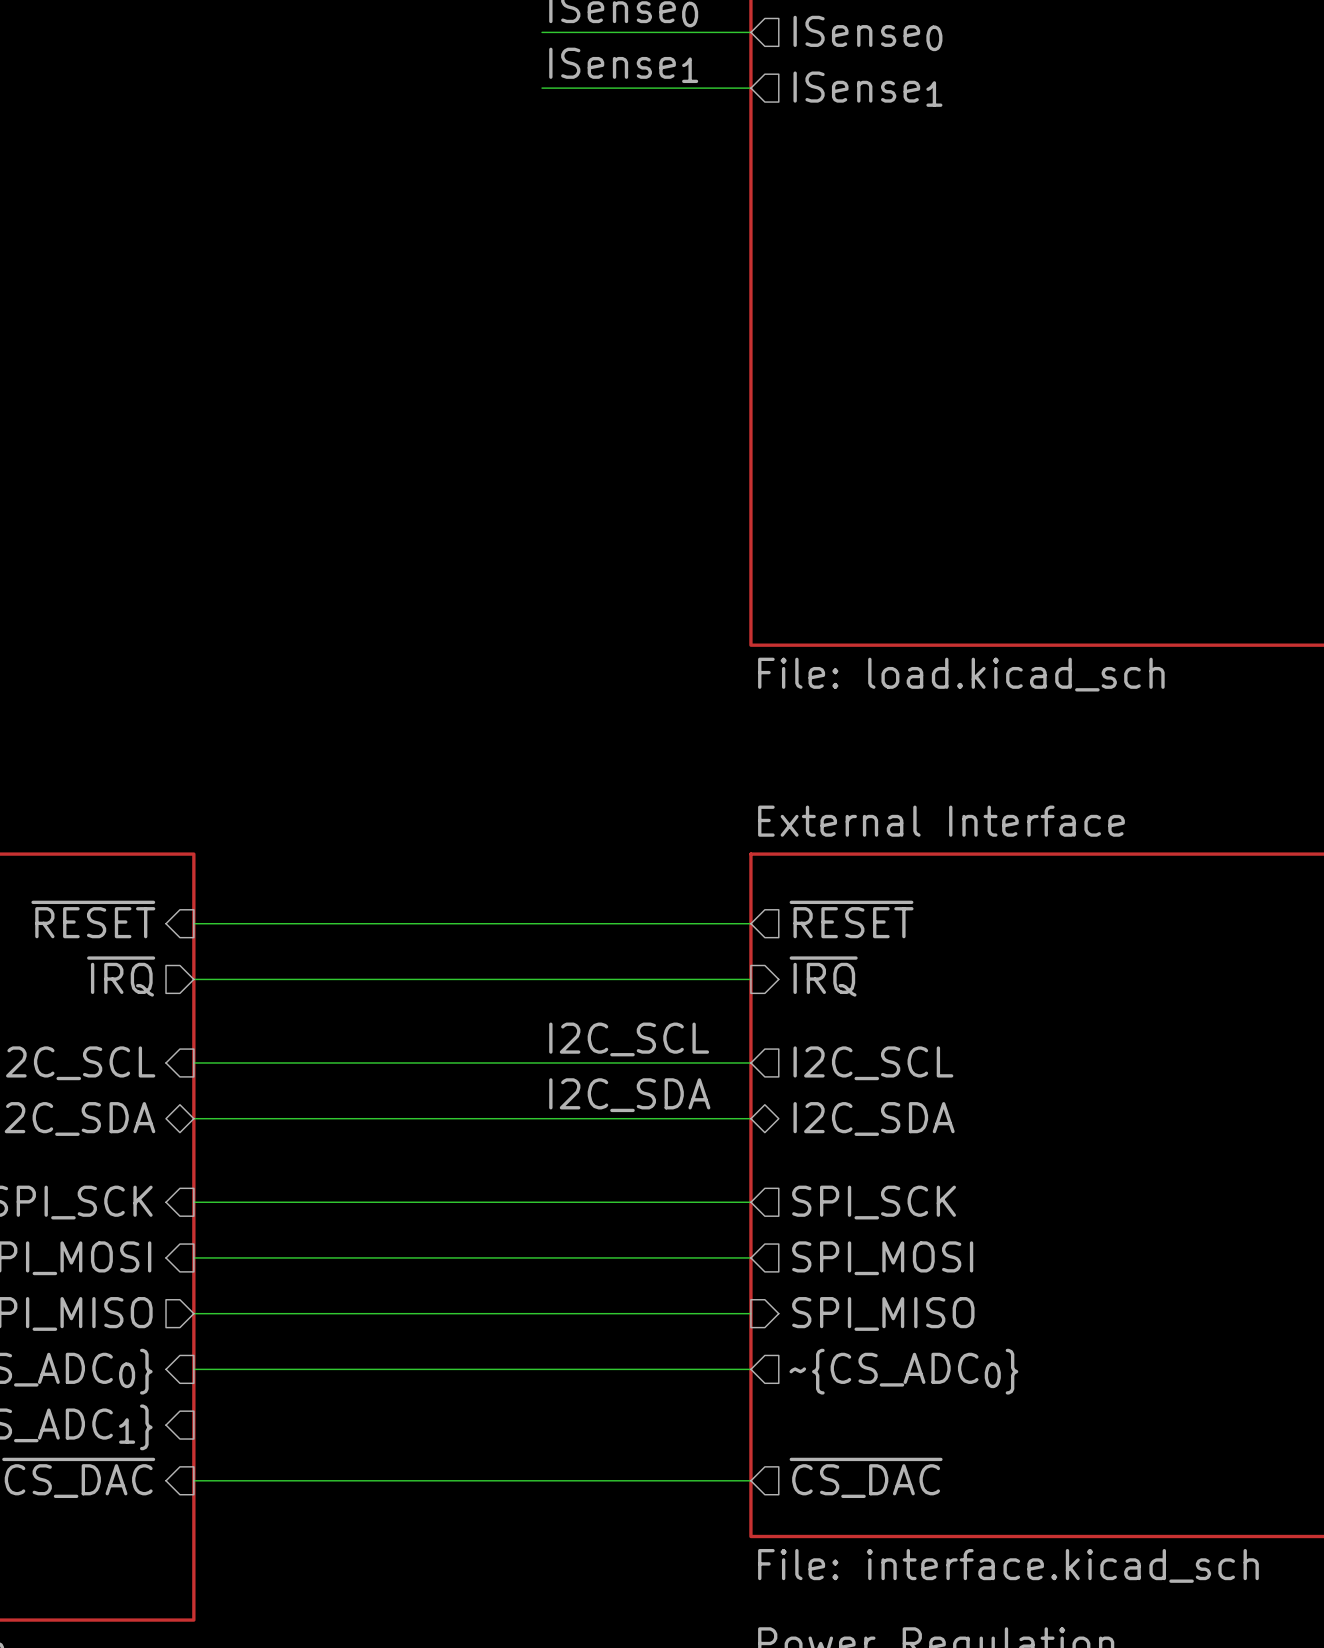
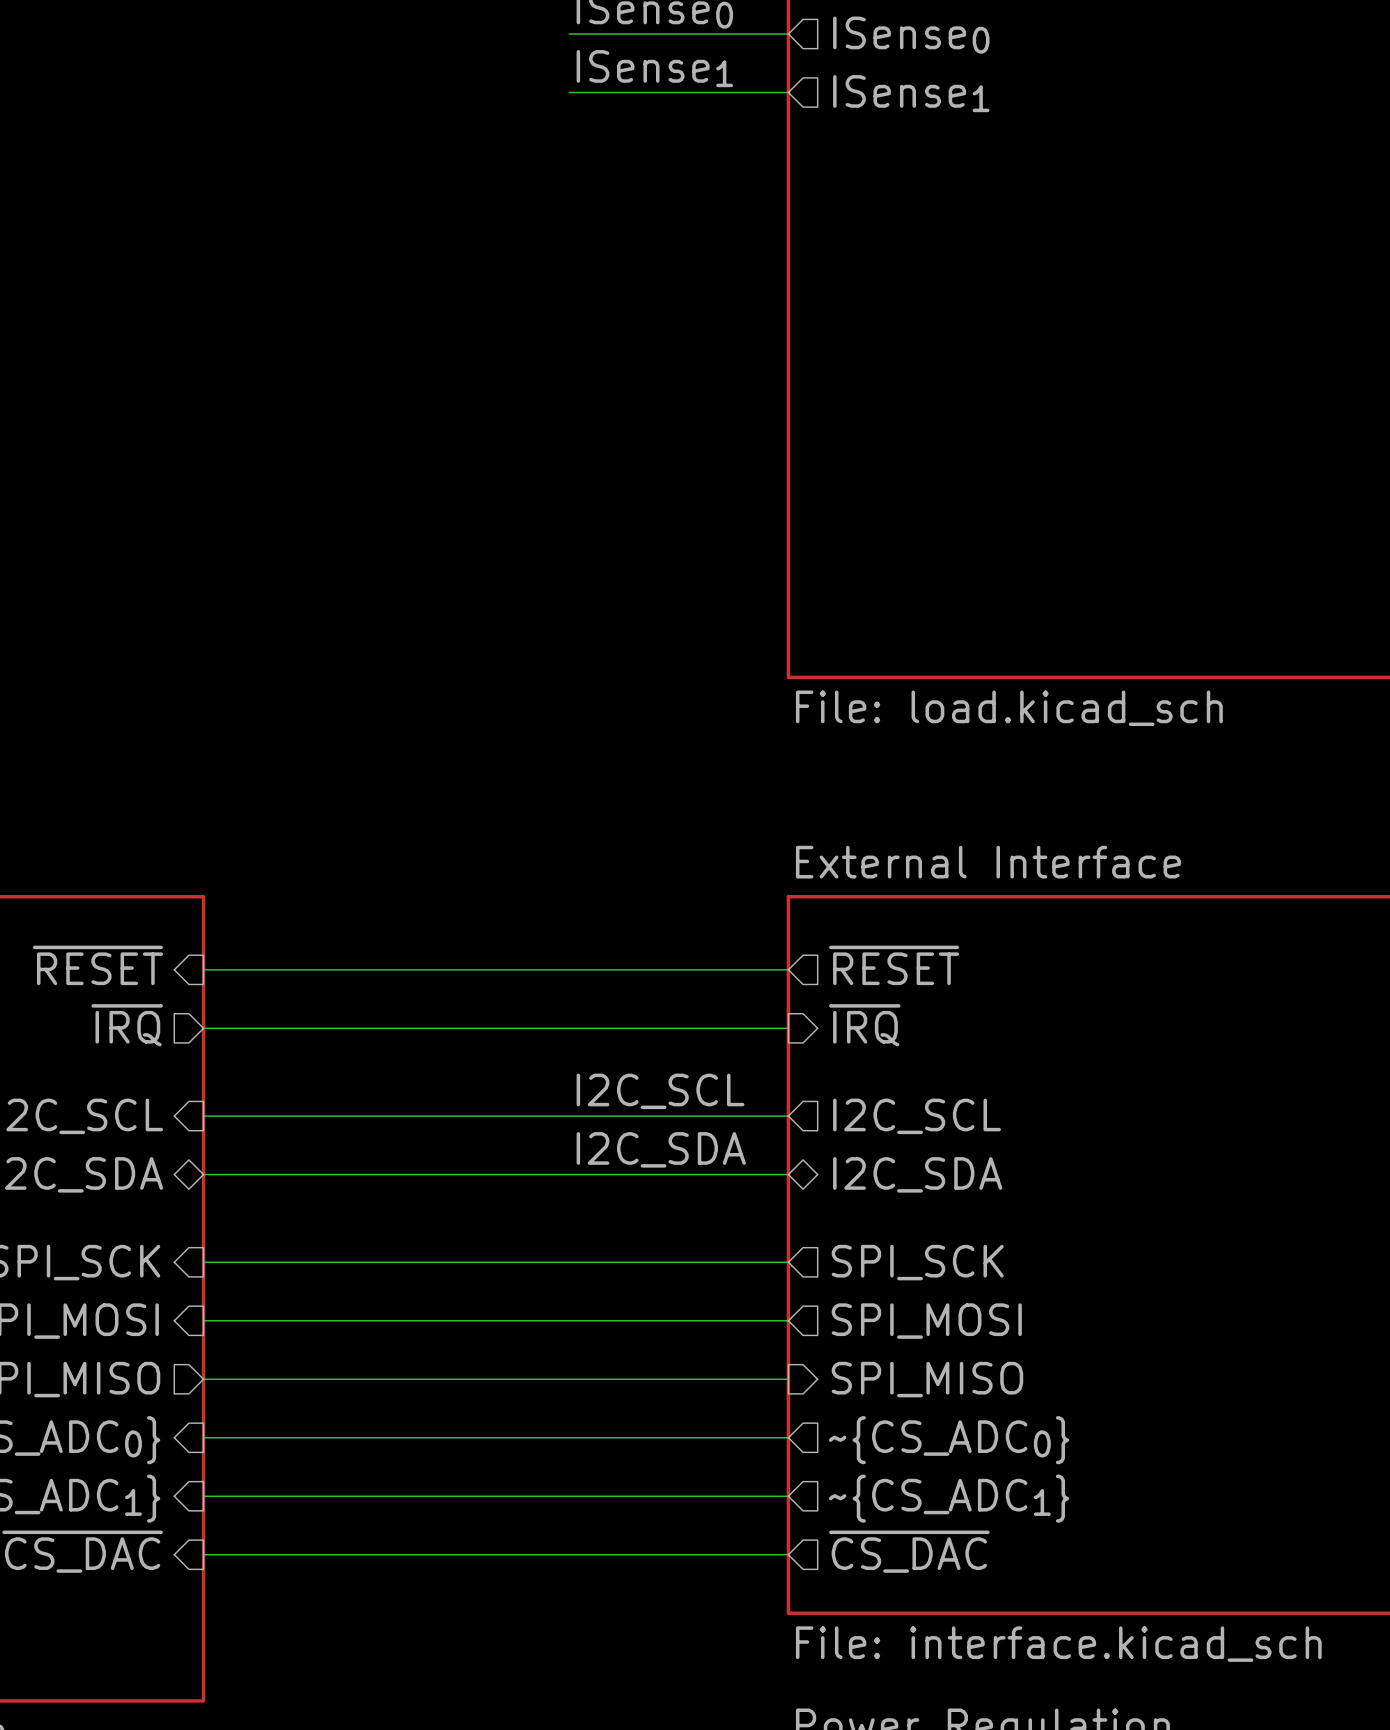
wire: none -> (203, 1496) (788, 1496)
sheet pin: none -> ~{CS_ADC1} (949, 1498)

